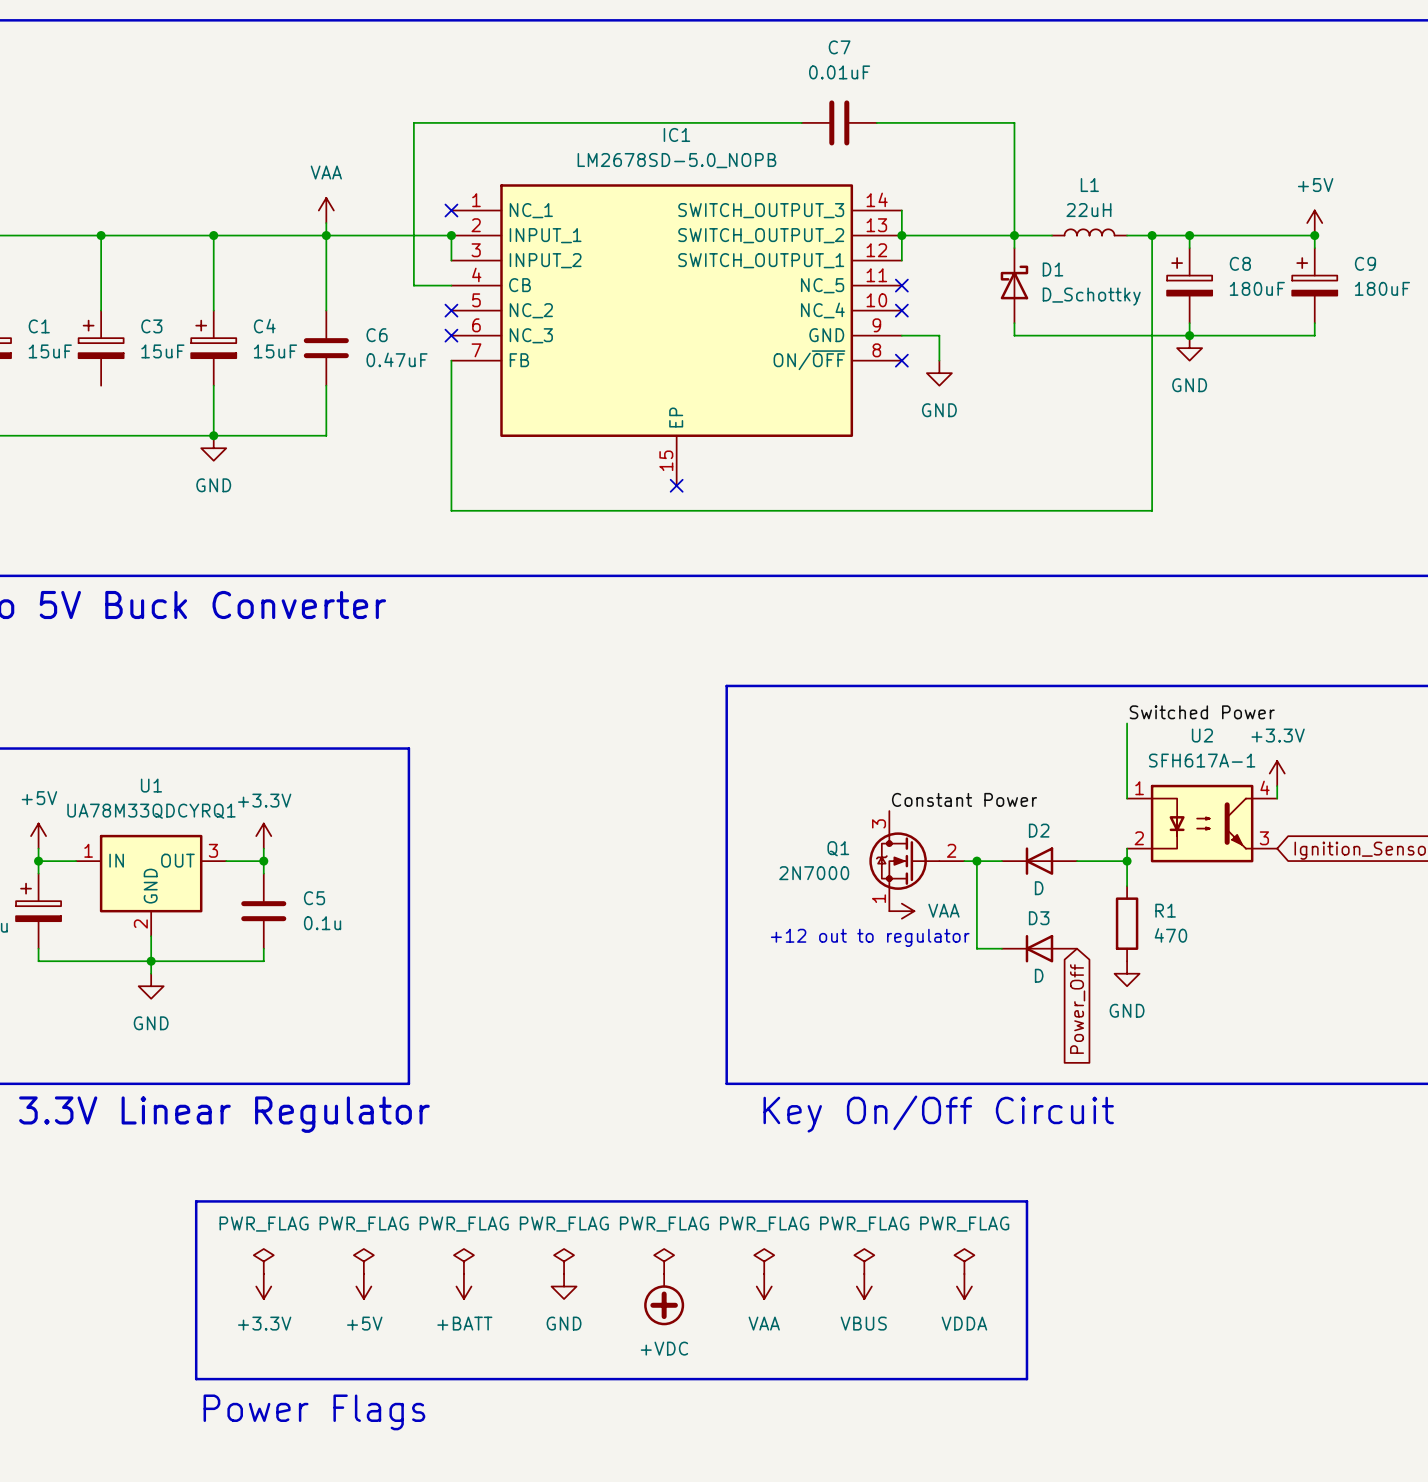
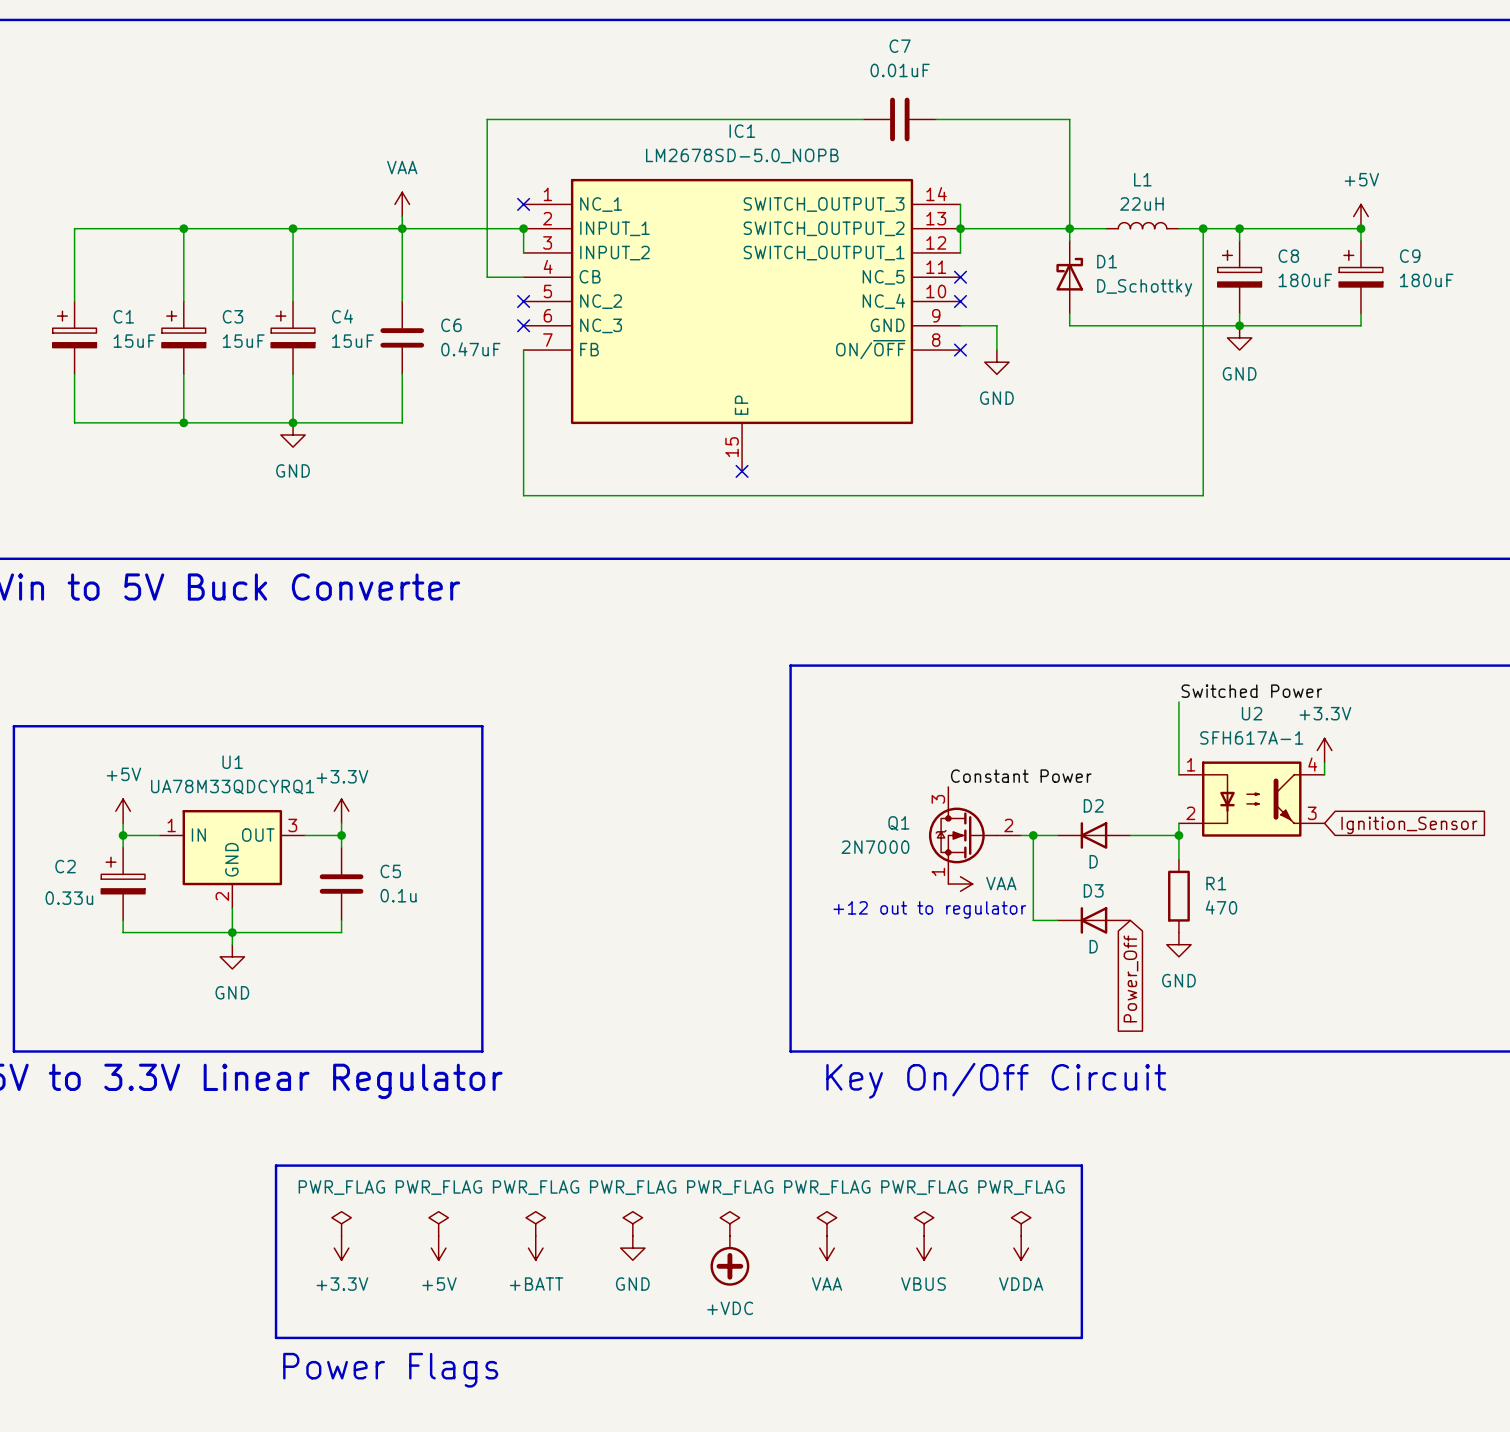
wire: none -> (183, 374) (183, 422)
junction: none -> (183, 422)

